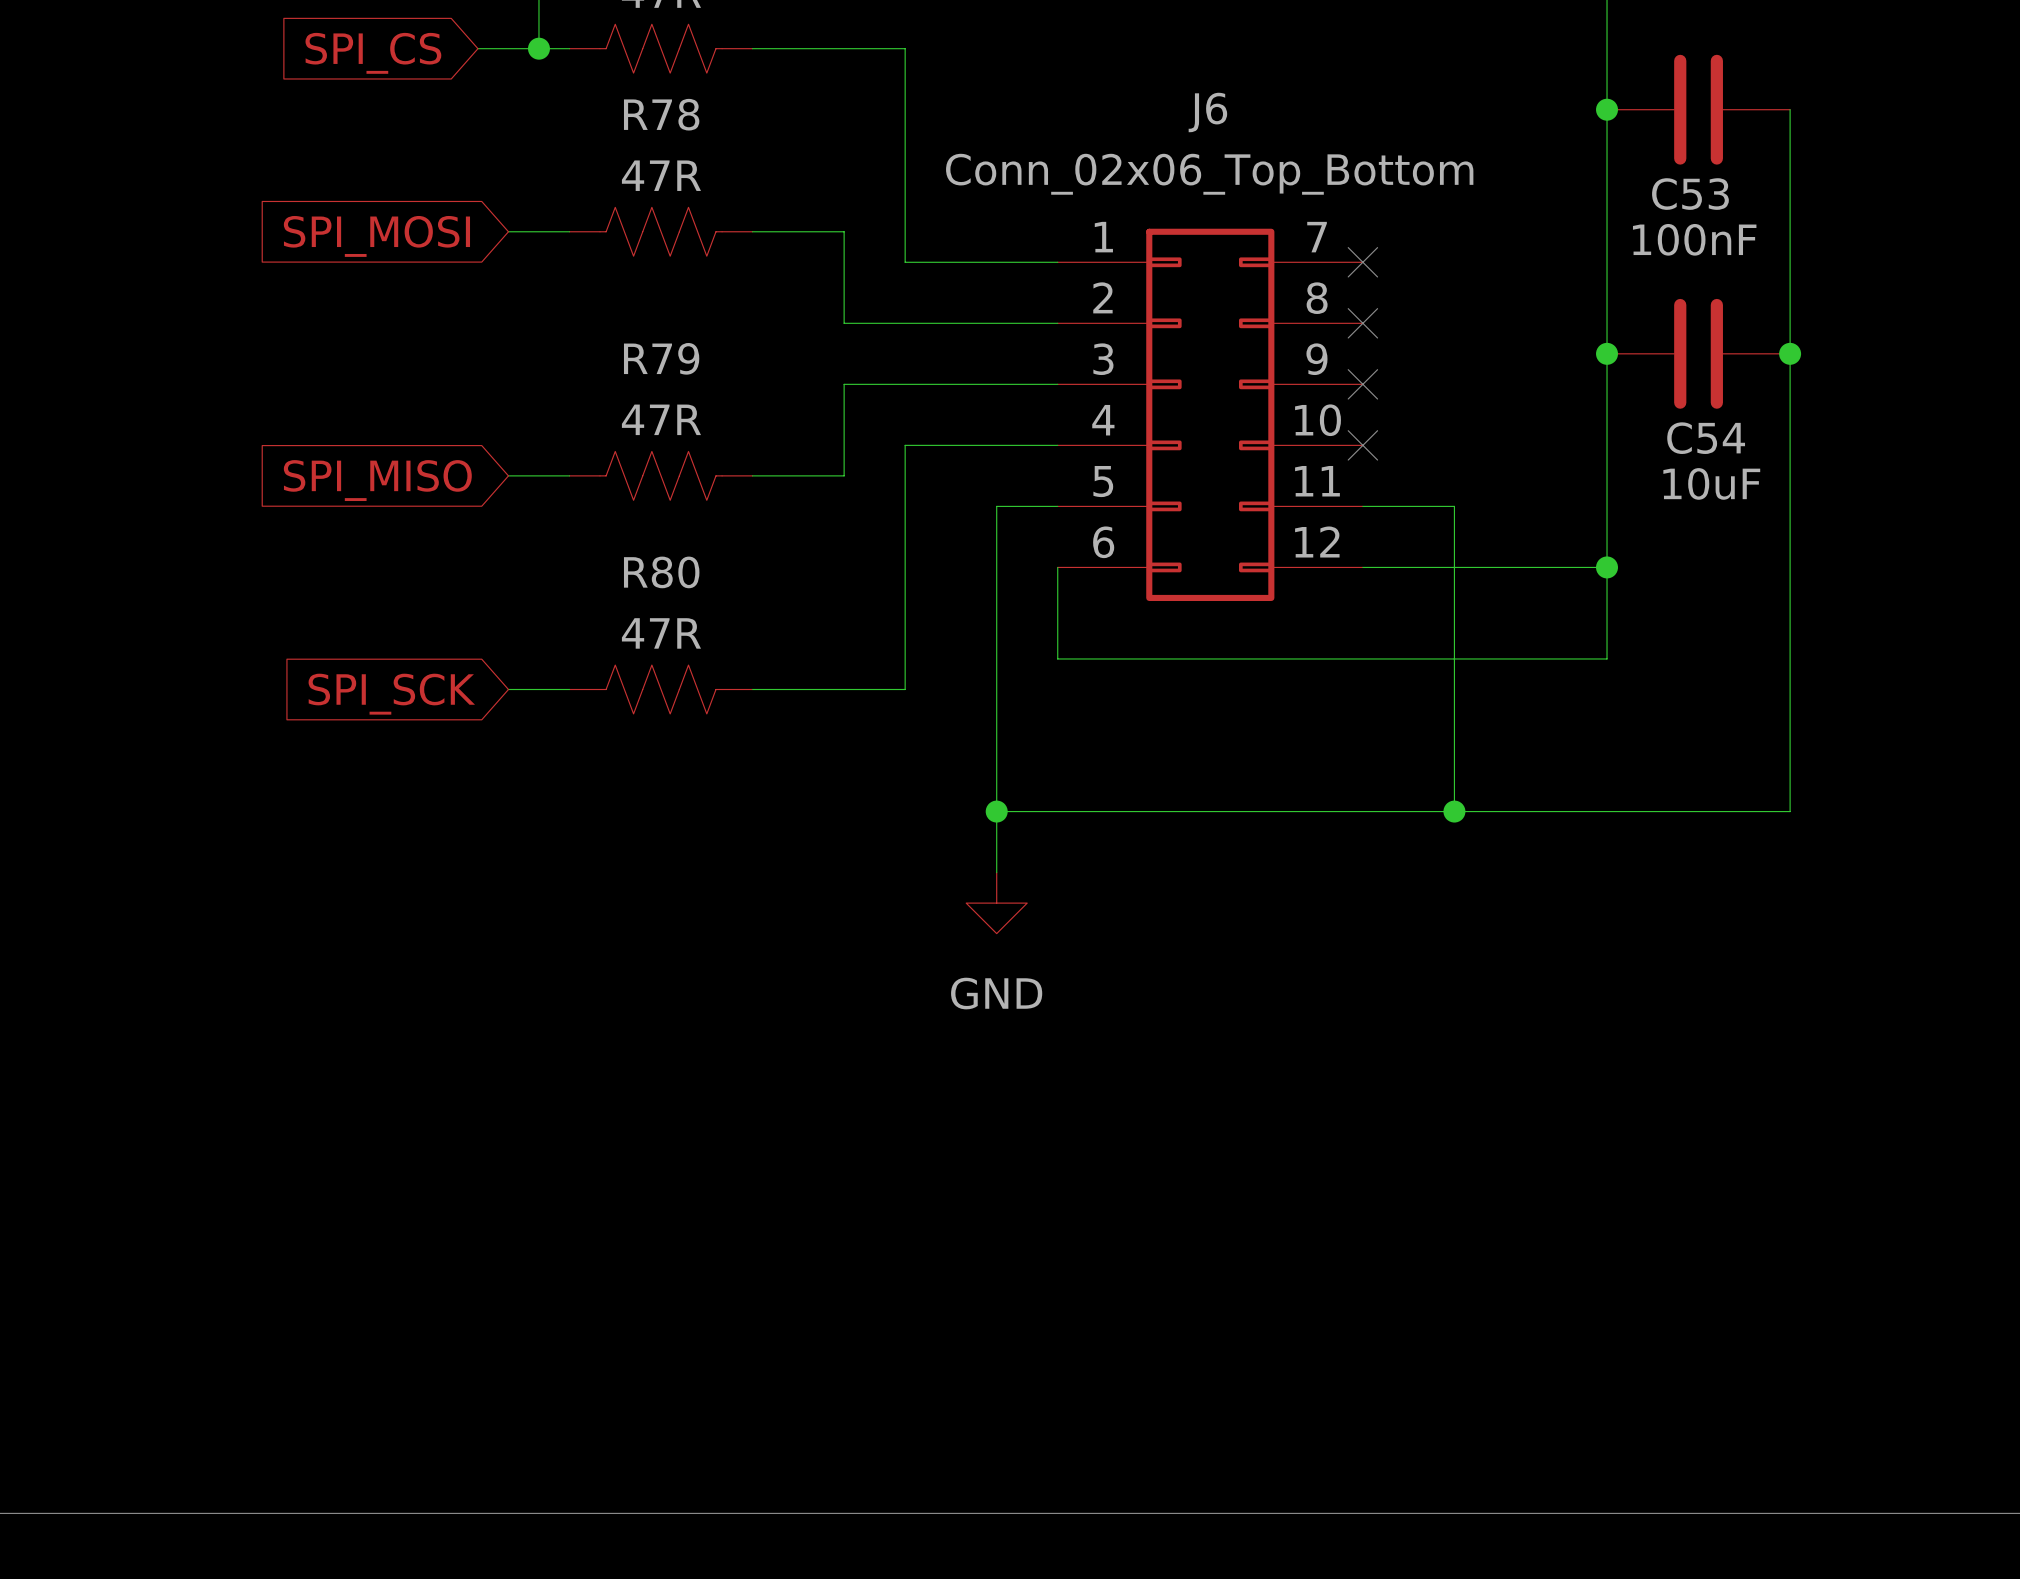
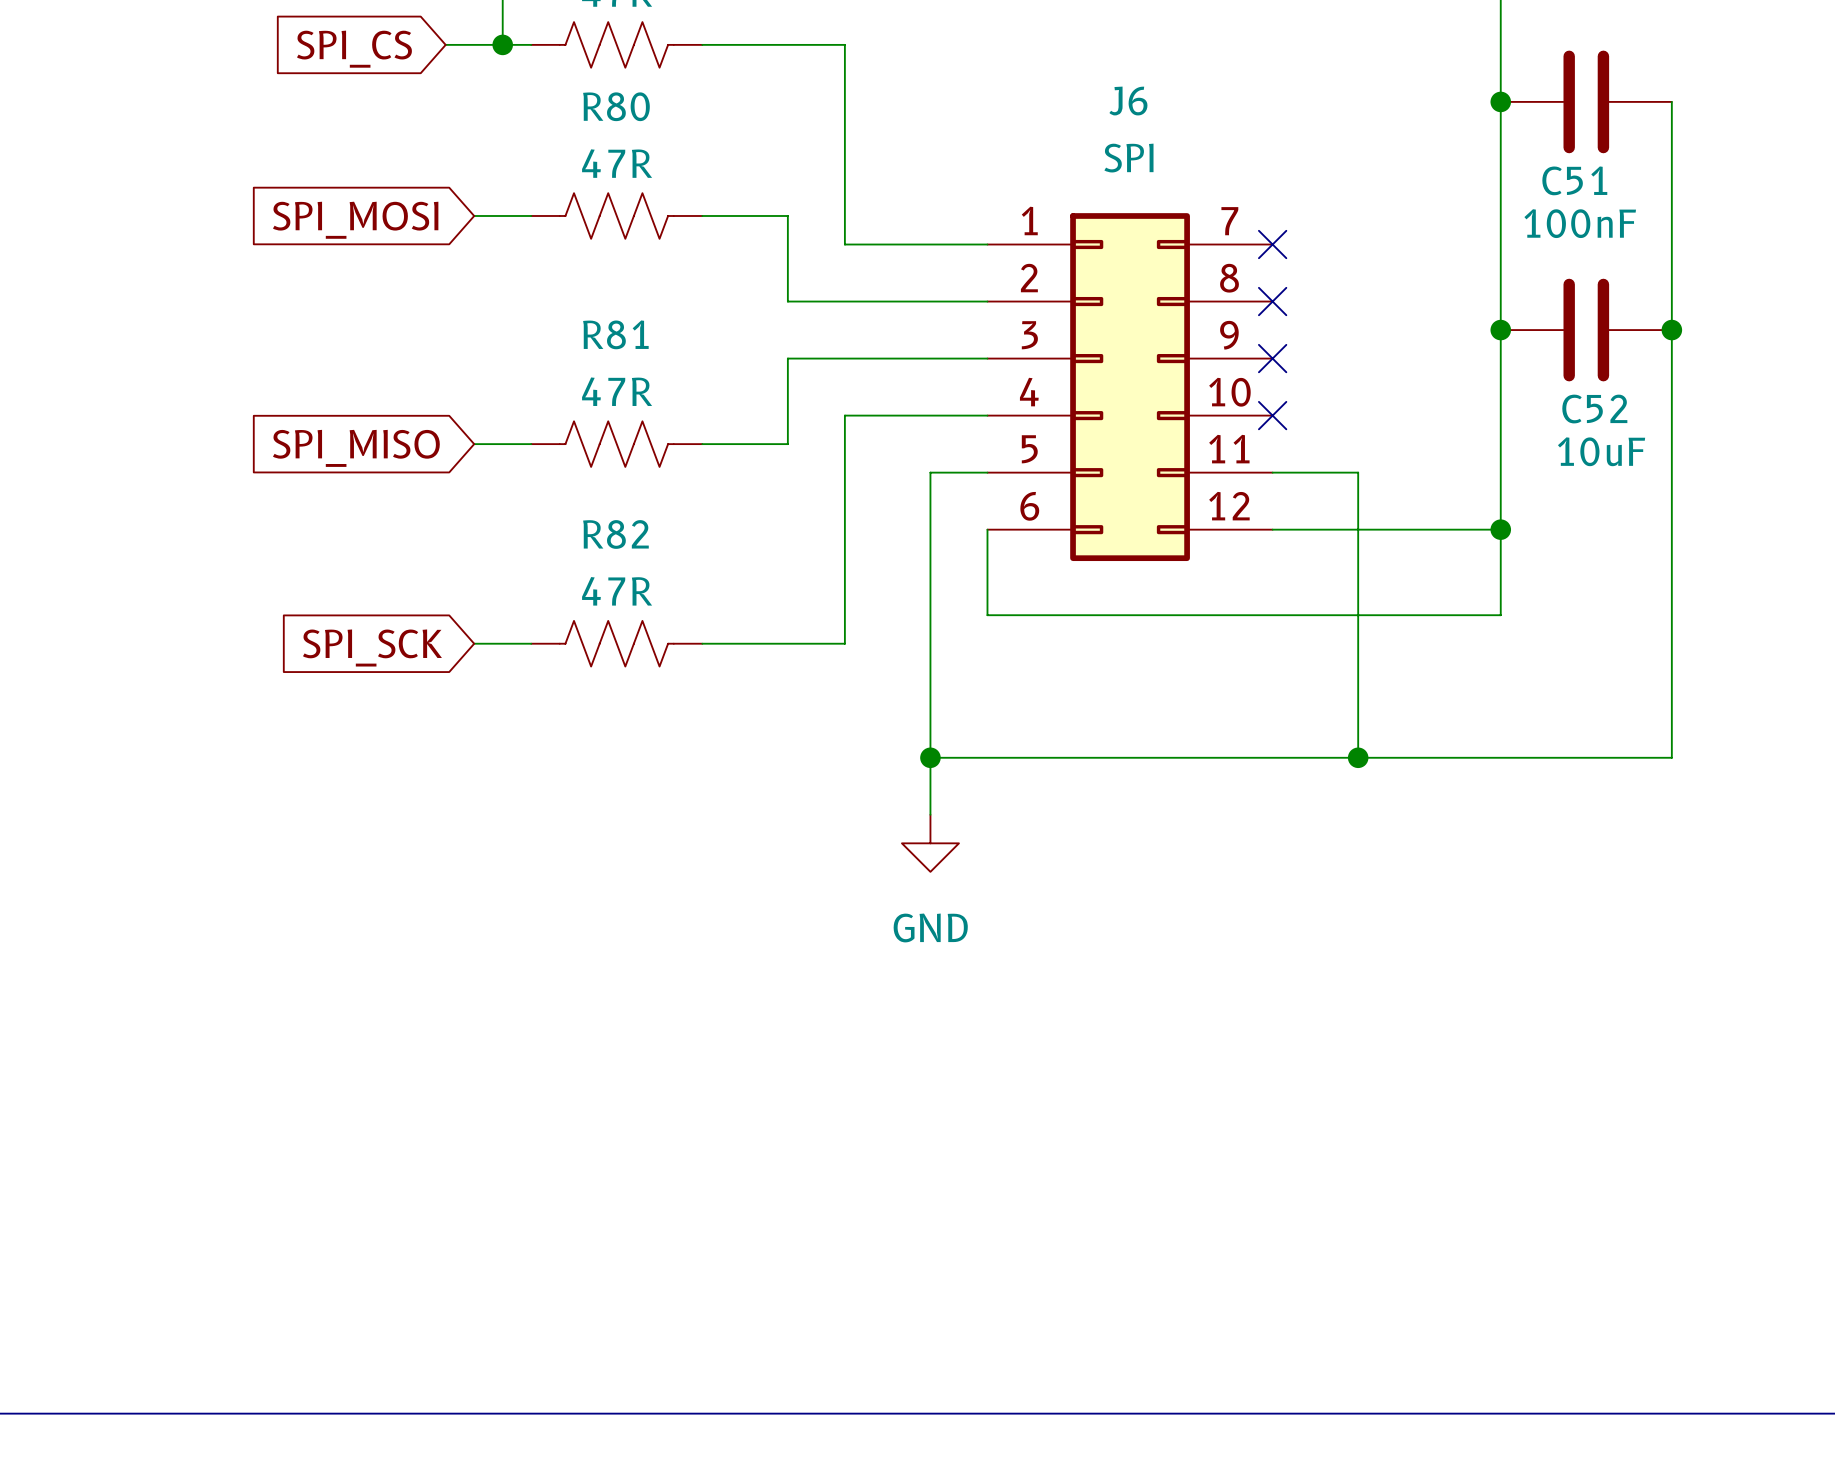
R78 name: R78 (661, 114) -> R80 (616, 106)
J6 value: Conn_02x06_Top_Bottom (1209, 174) -> SPI (1128, 158)
C53 name: C53 (1690, 194) -> C51 (1574, 180)
R79 name: R79 (661, 358) -> R81 (615, 334)
C54 name: C54 (1706, 438) -> C52 (1594, 409)
R80 name: R80 (661, 572) -> R82 (615, 534)

